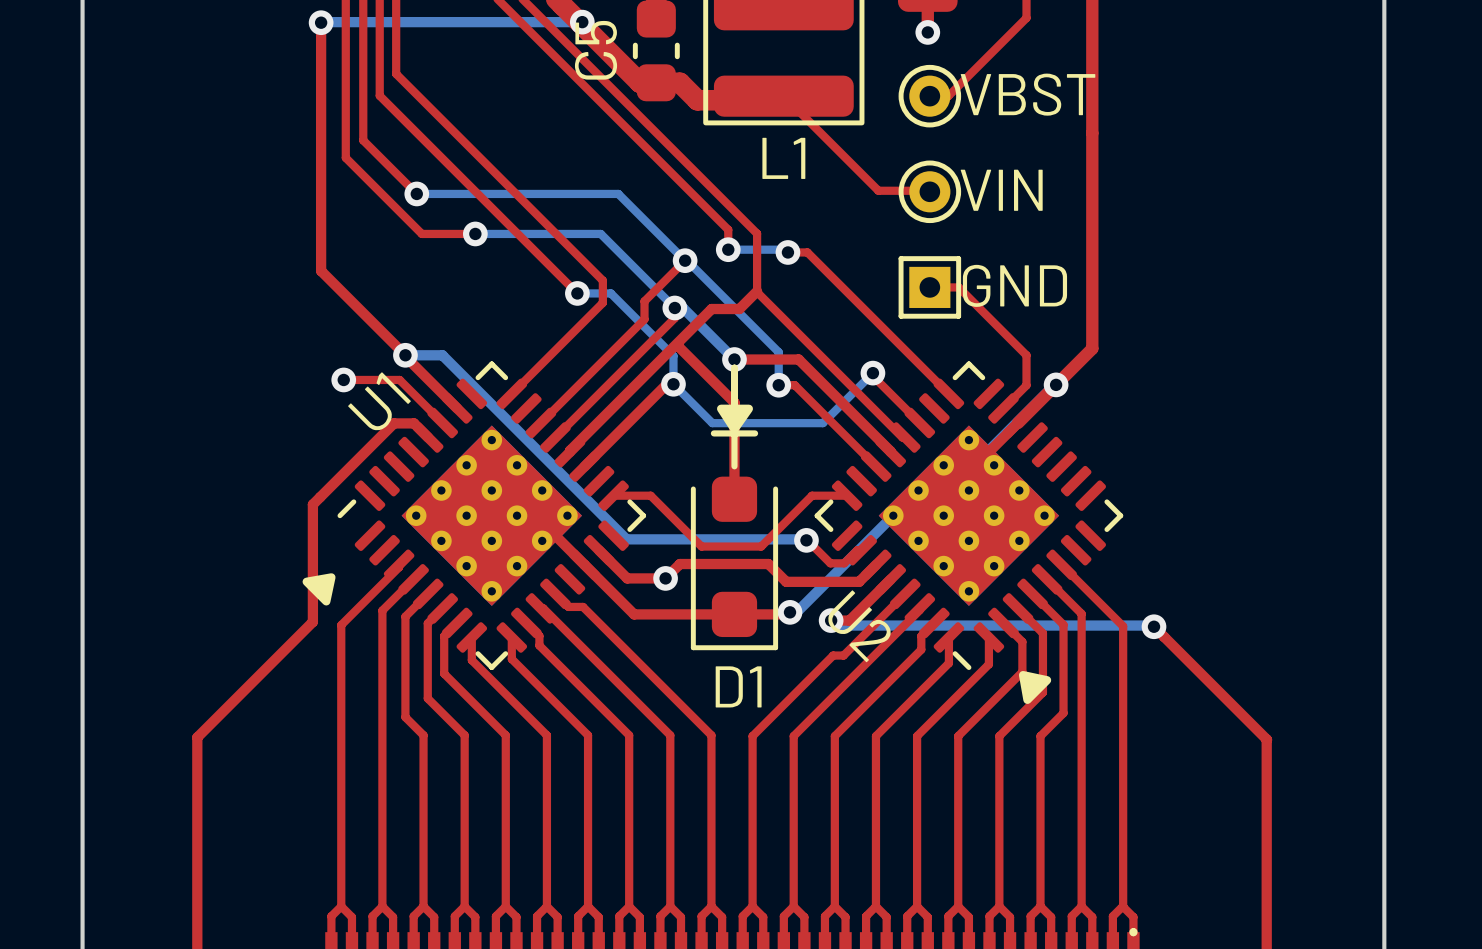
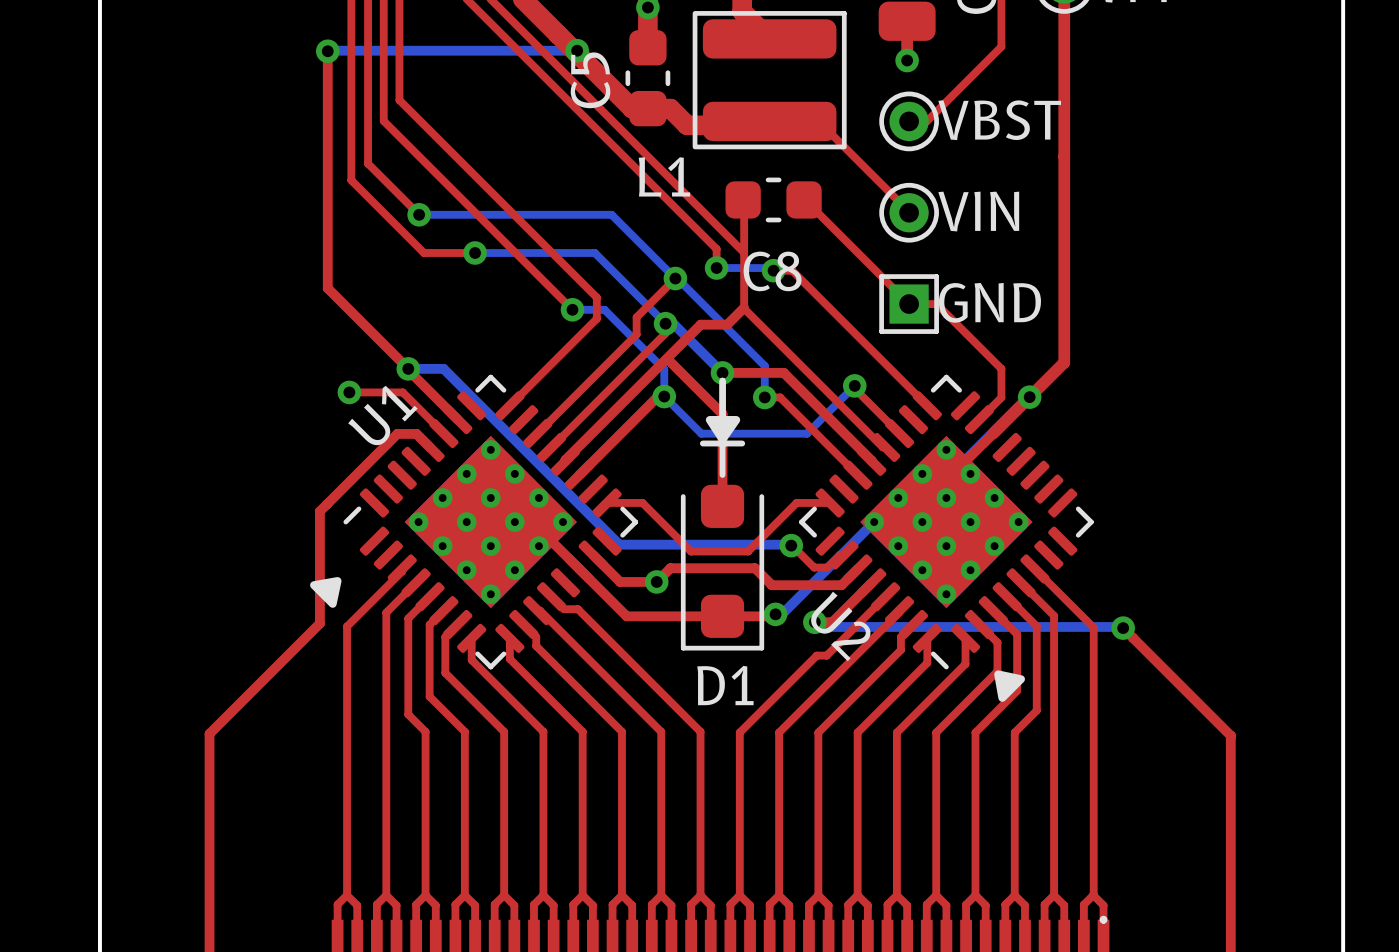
top track: (783, 96) (878, 190) (929, 190) -> (769, 121) (818, 121) (909, 211)
L1 name position: L1 (783, 158) -> L1 (664, 176)
top track: none -> (743, 199) (744, 252)
C8: none -> (773, 199)
top track: none -> (804, 199) (909, 304)

